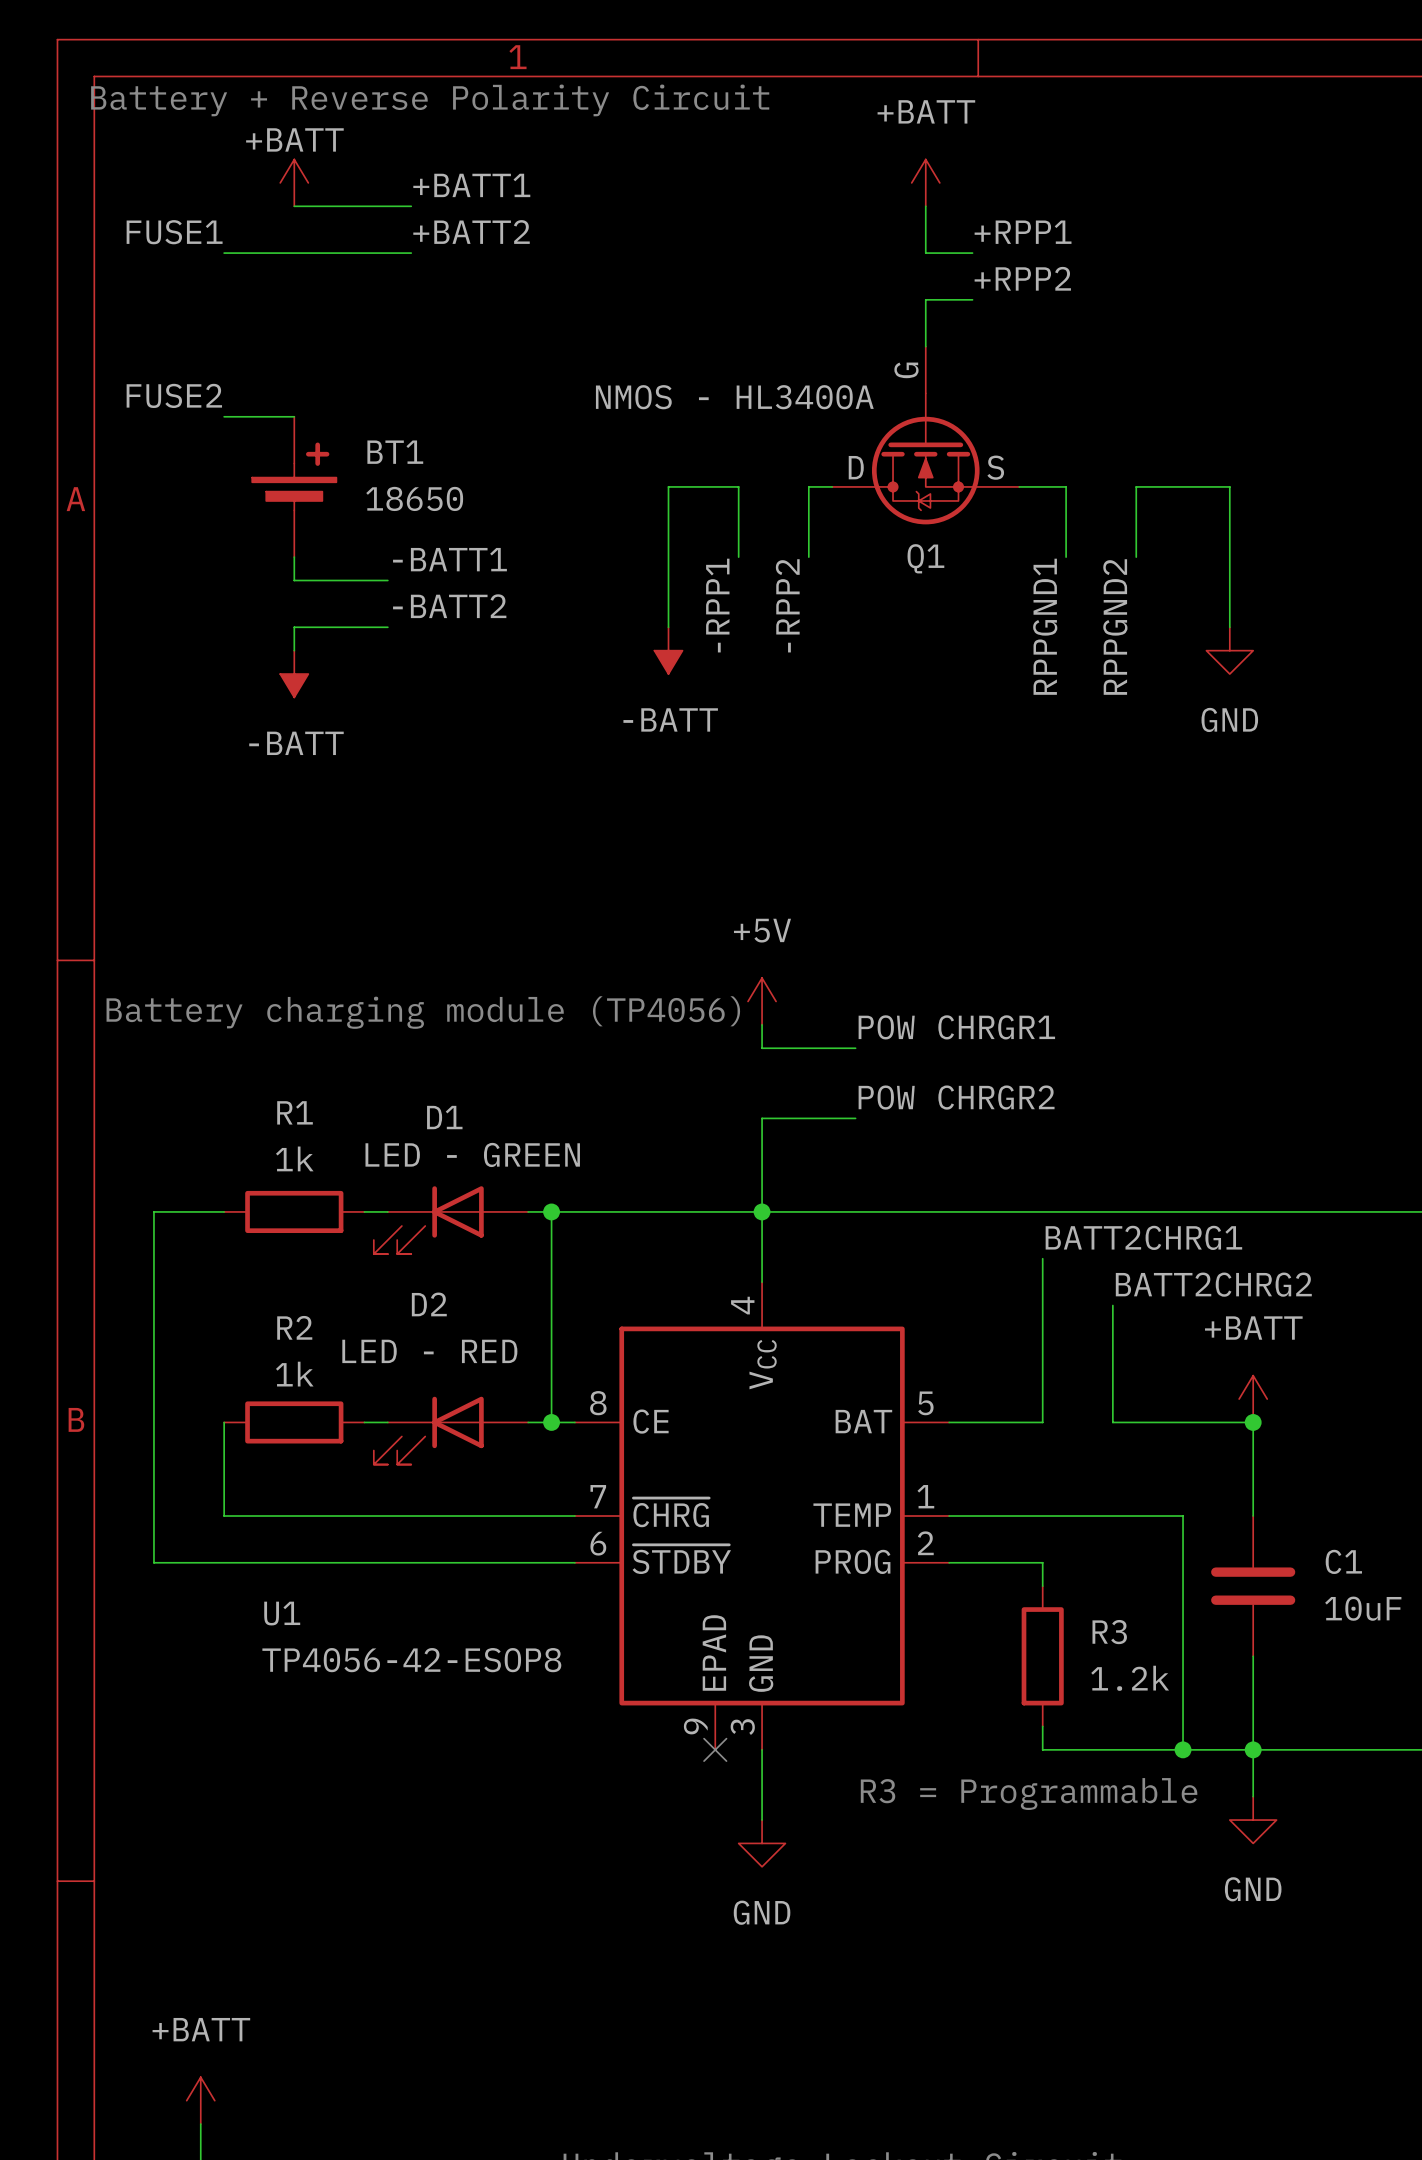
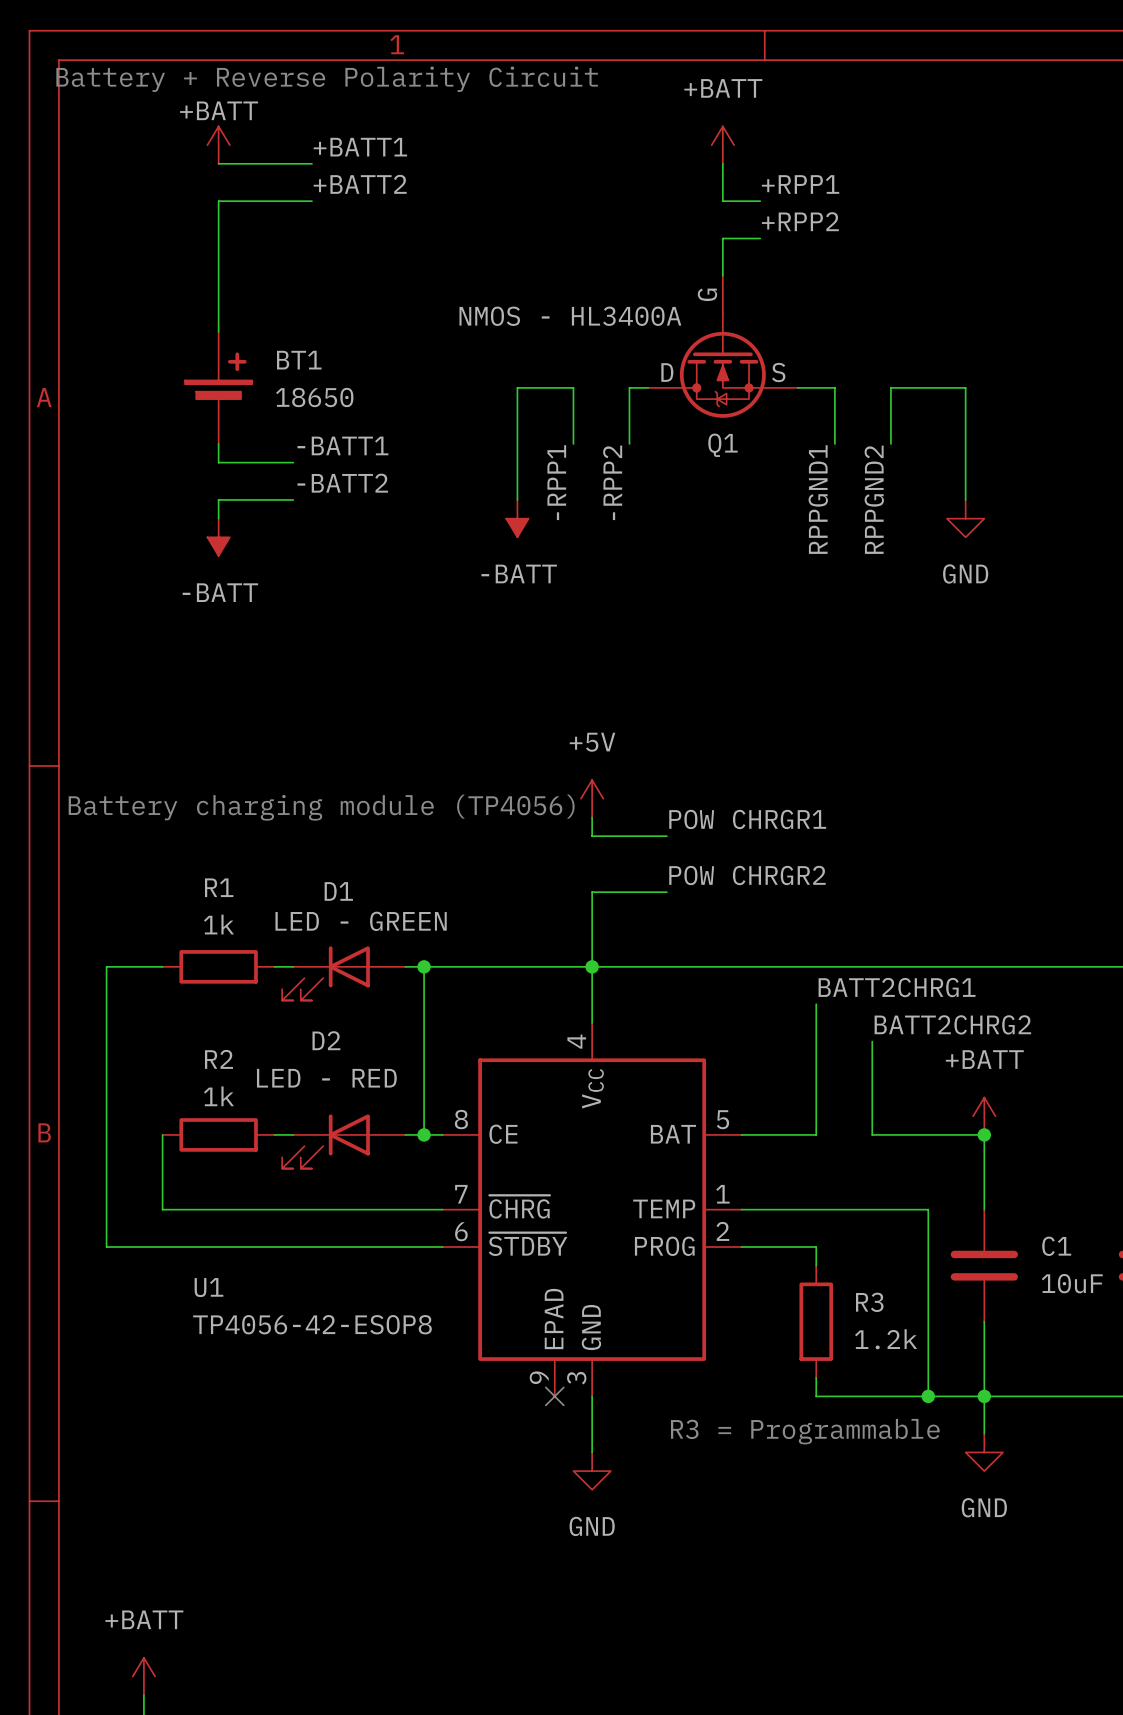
label: FUSE1 (174, 232) -> none
wire: (224, 253) (294, 253) -> (218, 331) (218, 201)
label: FUSE2 (174, 395) -> none
wire: (224, 416) (294, 416) -> none

